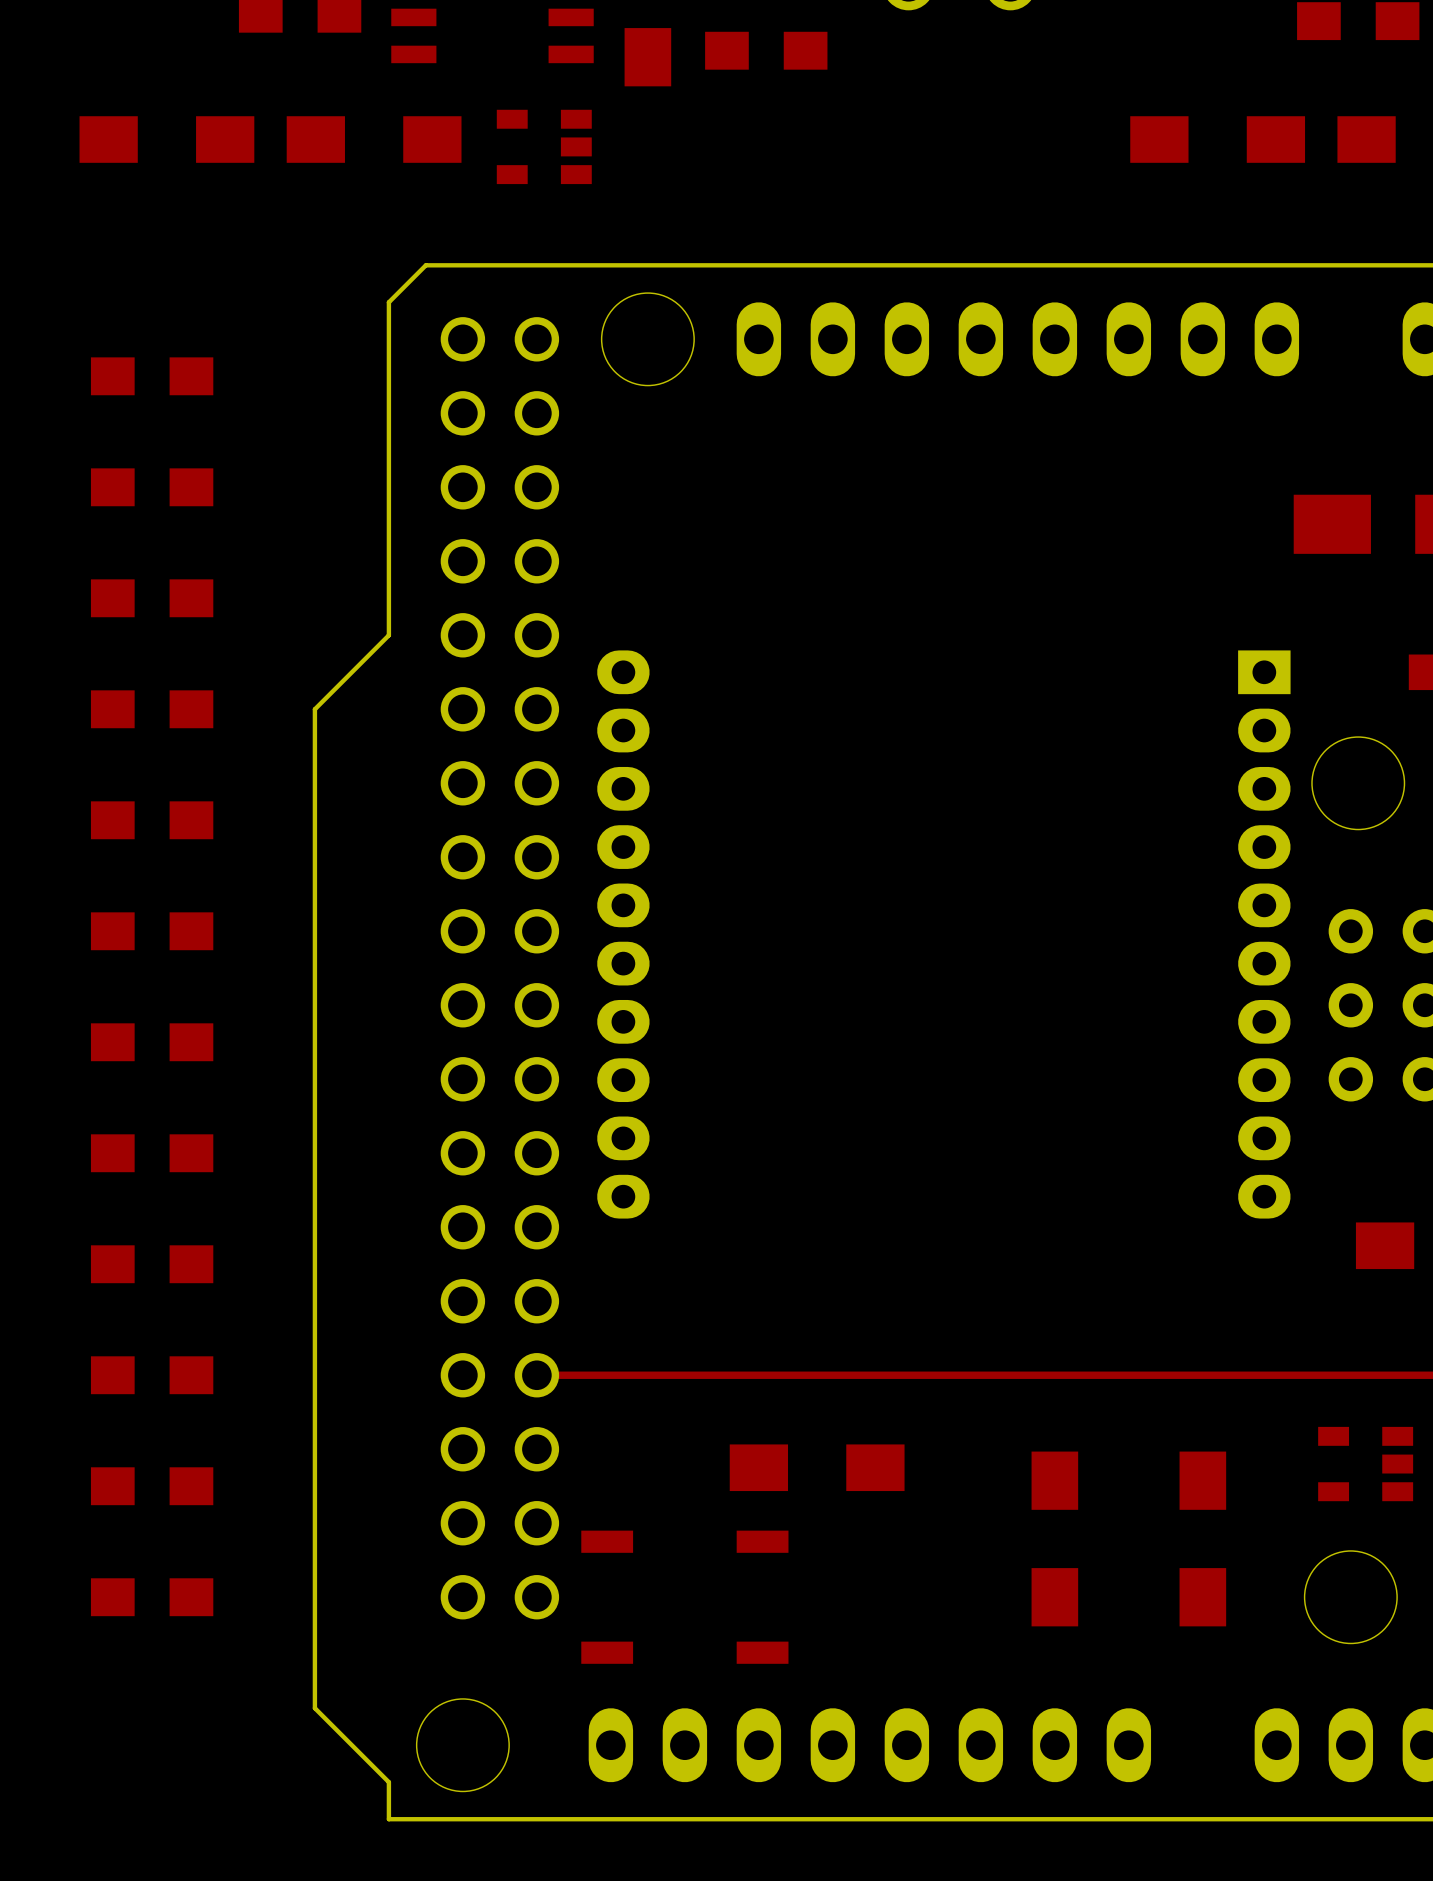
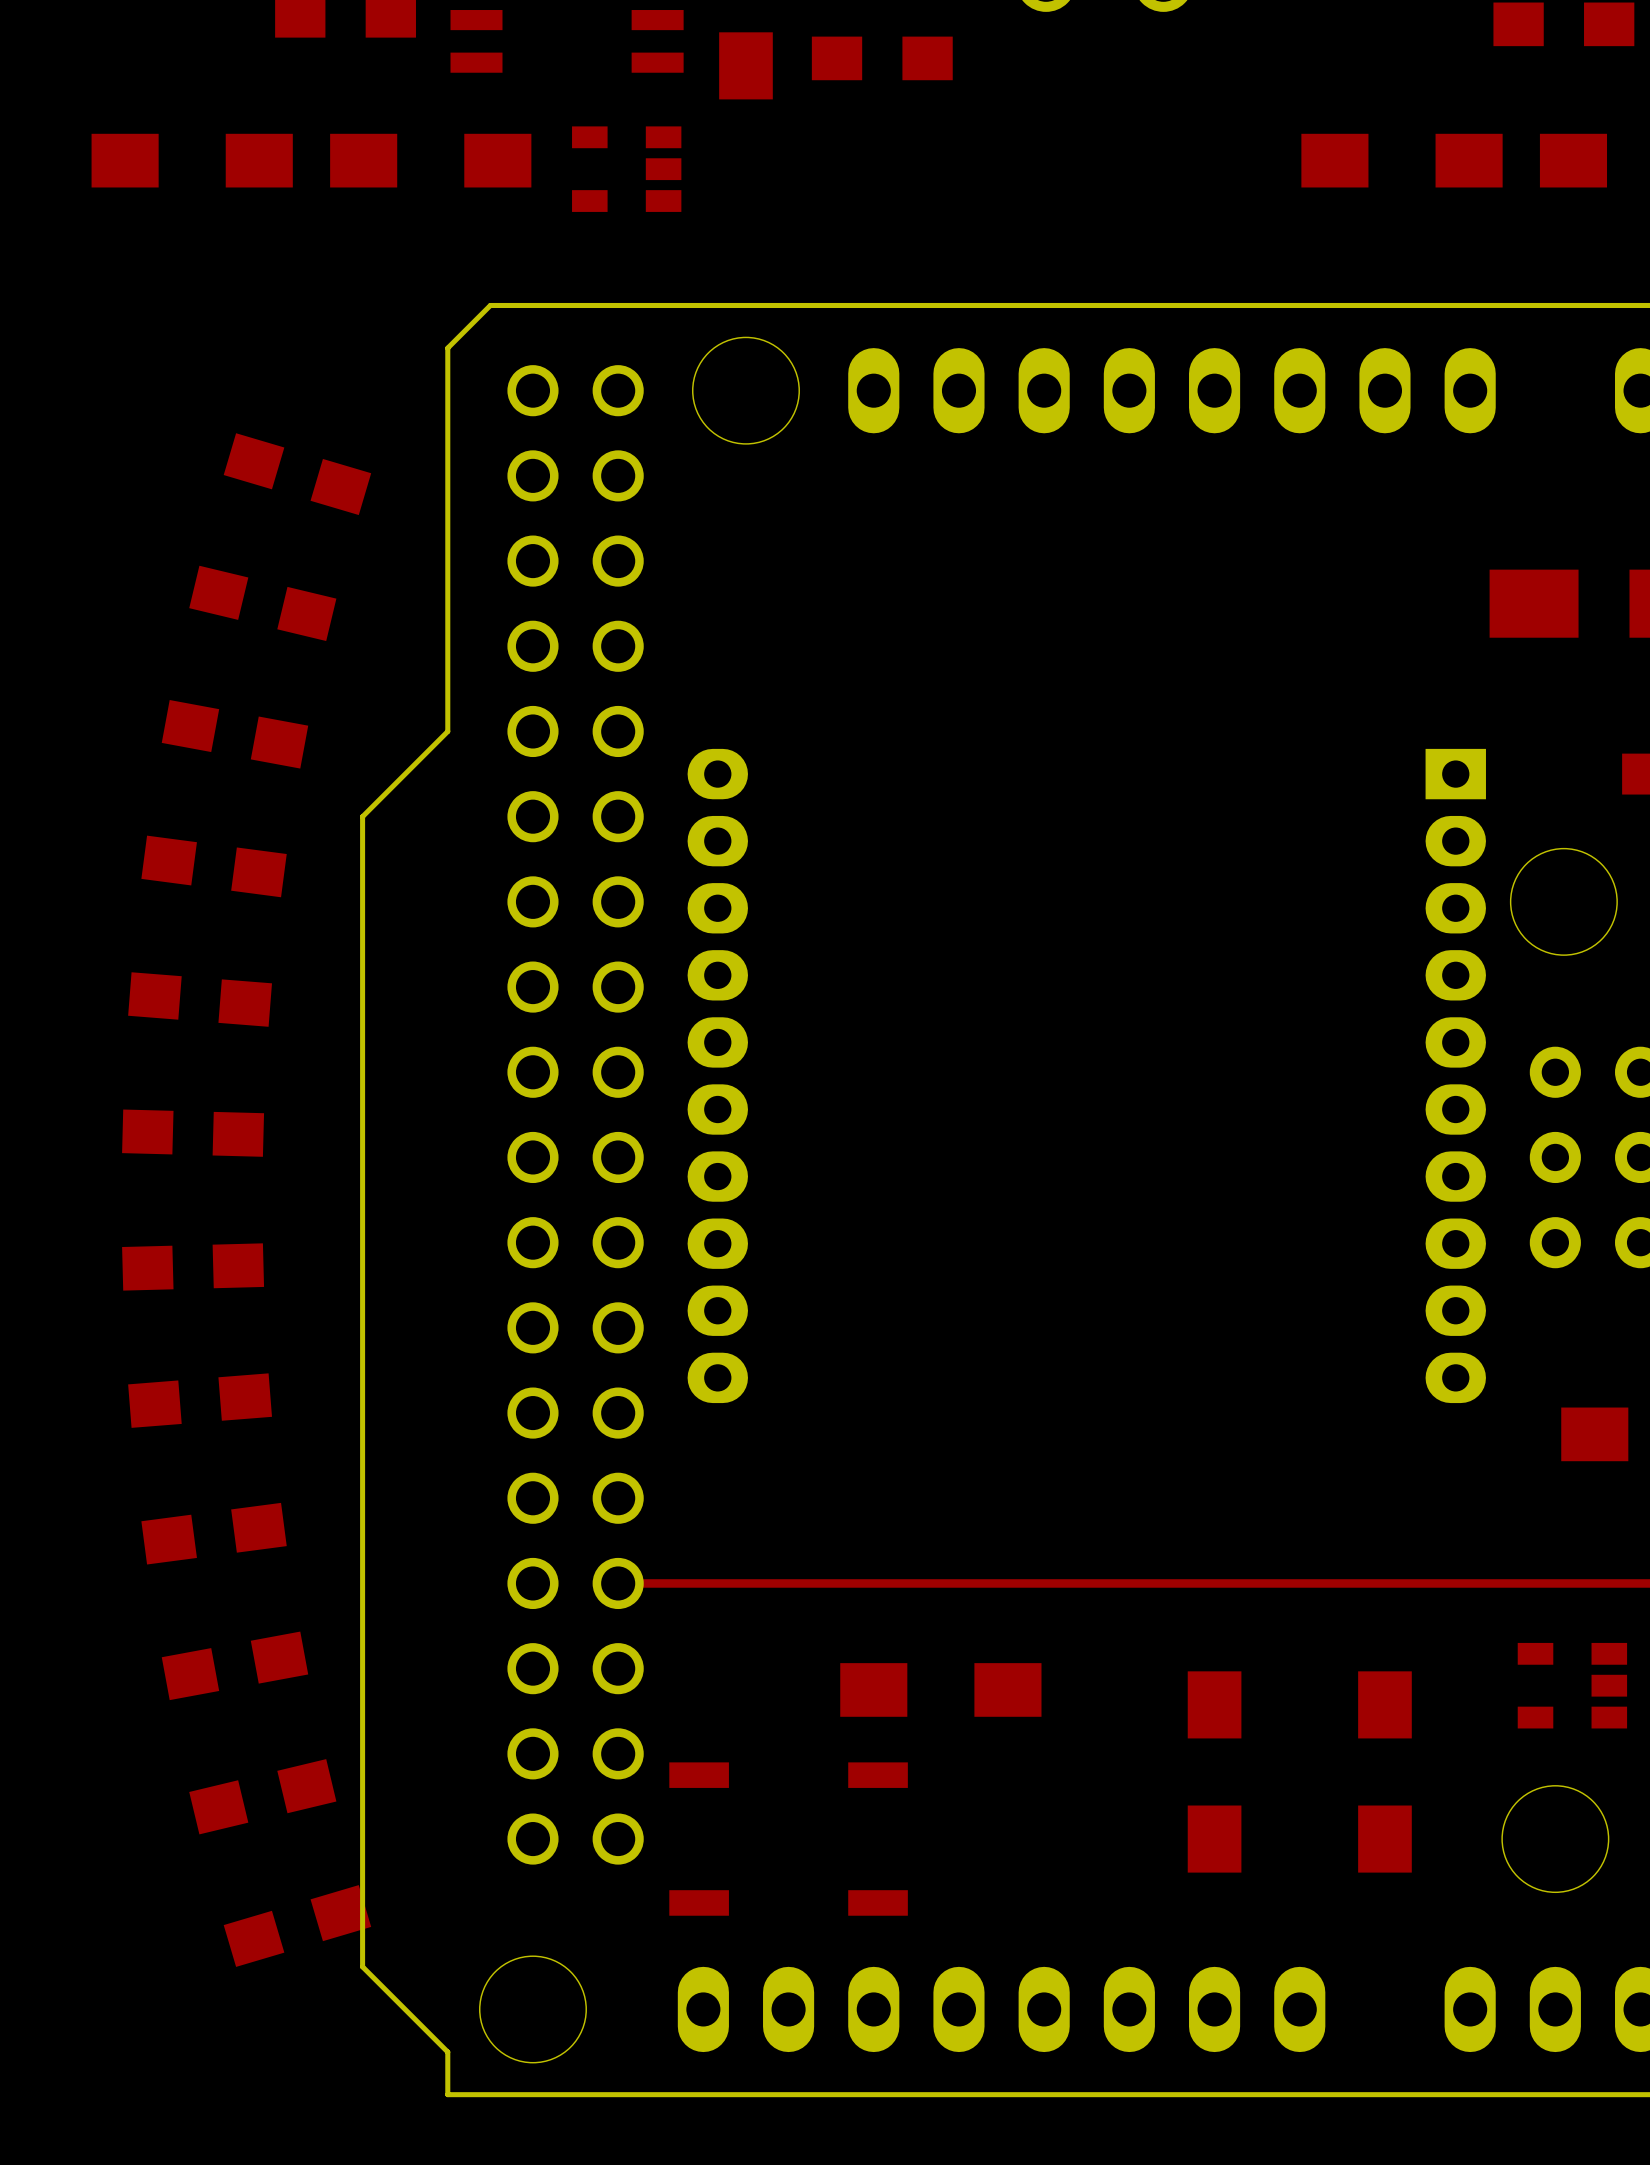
part: (152, 376) -> none
part: none -> (297, 474)
part: (152, 487) -> none
part: none -> (262, 603)
part: (152, 598) -> none
part: none -> (234, 734)
part: (152, 709) -> none
part: none -> (214, 866)
part: (152, 820) -> none
part: none -> (200, 999)
part: (152, 931) -> none
part: none -> (193, 1133)
part: (152, 1042) -> none
part: none -> (193, 1266)
part: (152, 1153) -> none
part: none -> (200, 1400)
part: (152, 1264) -> none
part: none -> (214, 1533)
part: (152, 1375) -> none
part: none -> (234, 1665)
part: (152, 1486) -> none
part: none -> (262, 1796)
part: (152, 1597) -> none
part: none -> (297, 1926)

